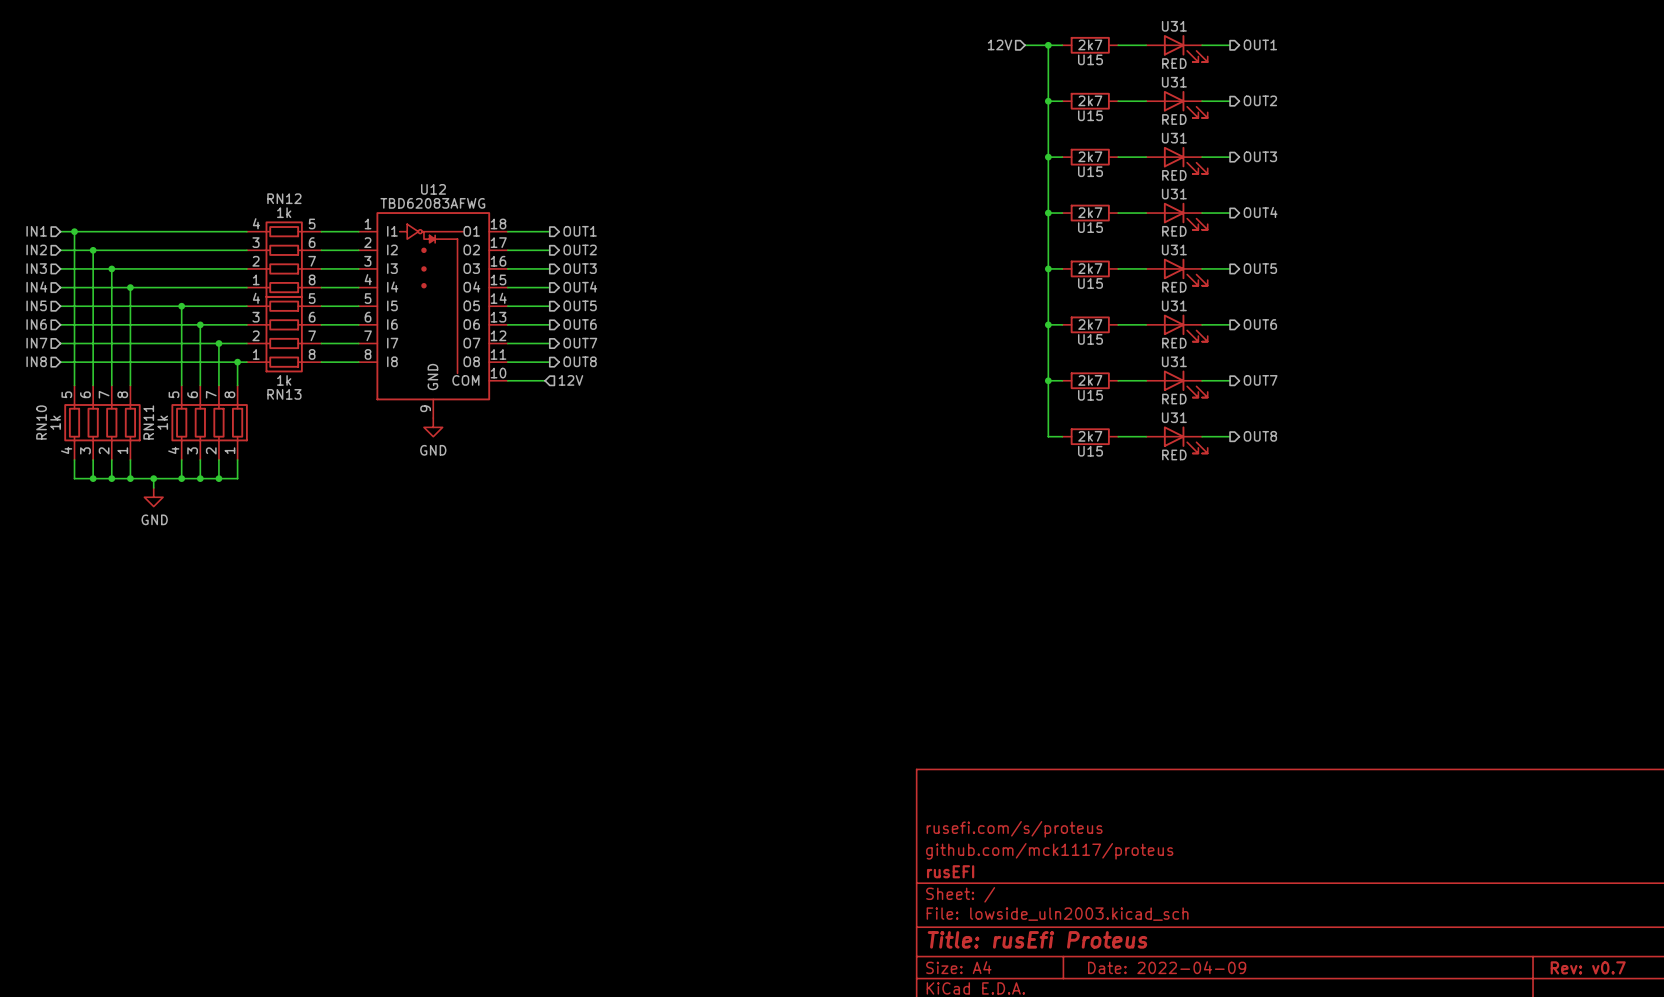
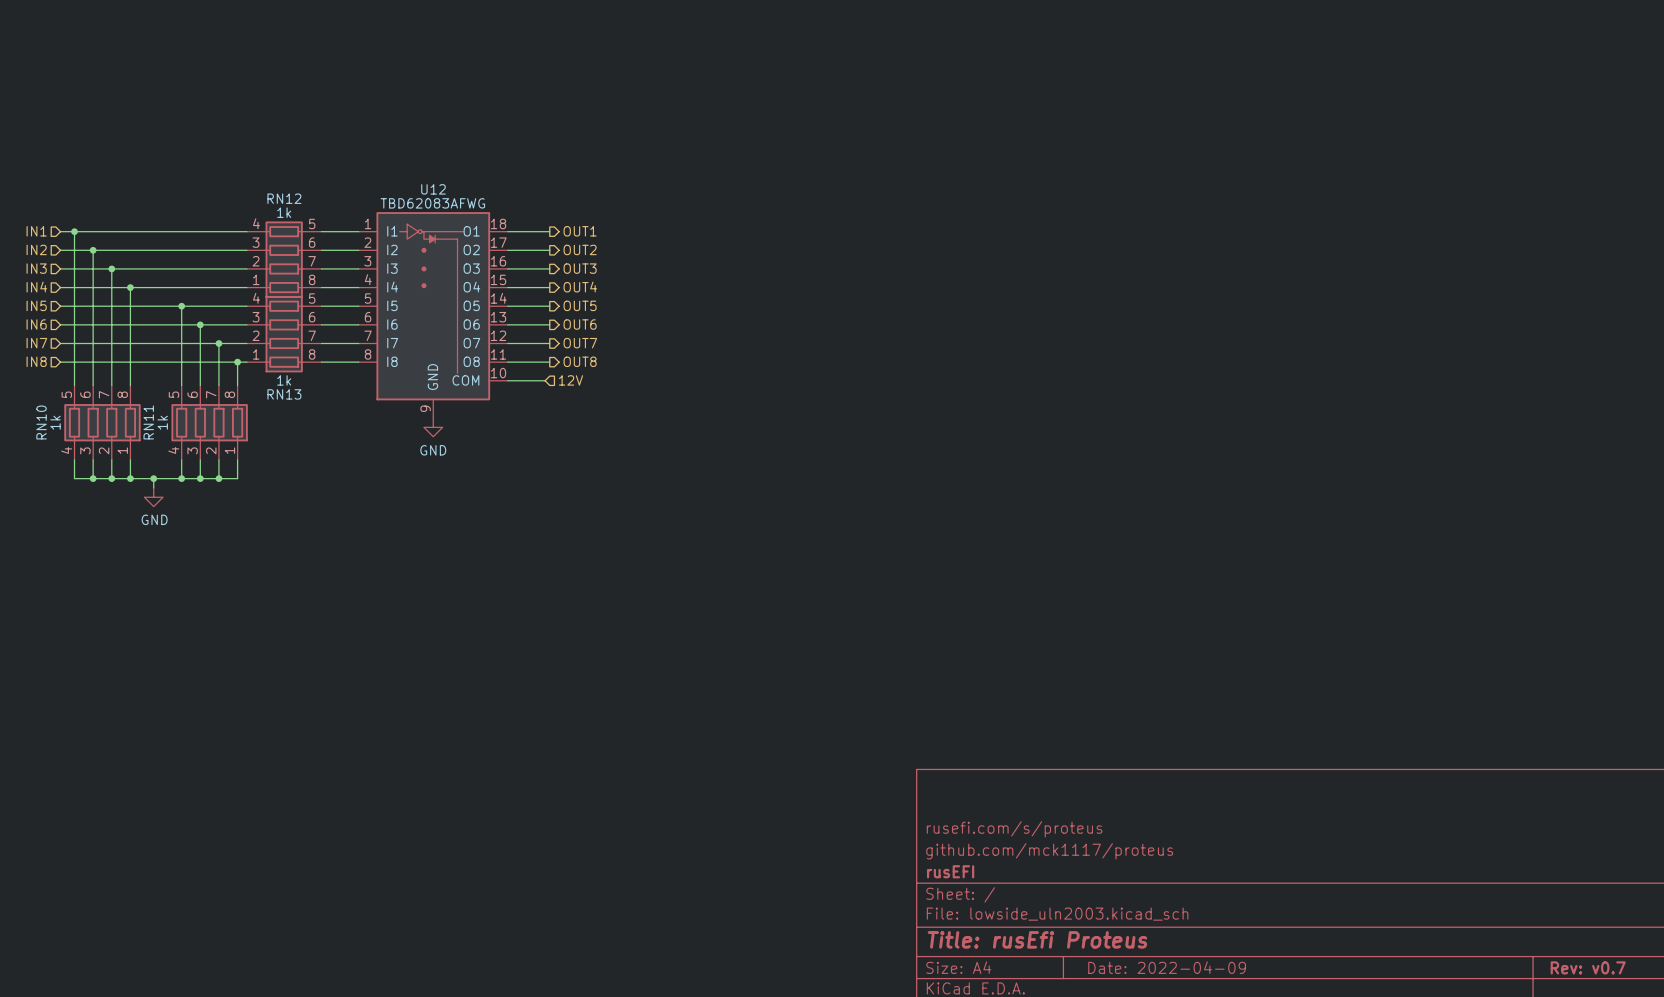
hierarchical label: 12V (1000, 44) -> none
hierarchical label: OUT1 (1260, 44) -> none
wire: (1025, 45) (1062, 45) -> none
wire: (1048, 45) (1048, 436) (1062, 436) -> none
junction: (1048, 45) -> none
U15: 2k7 (1090, 45) -> none
wire: (1118, 45) (1146, 45) -> none
wire: (1202, 45) (1230, 45) -> none
U31: RED (1176, 48) -> none
hierarchical label: OUT2 (1260, 100) -> none
wire: (1048, 101) (1062, 101) -> none
junction: (1048, 101) -> none
U15: 2k7 (1090, 101) -> none
wire: (1118, 101) (1146, 101) -> none
wire: (1202, 101) (1230, 101) -> none
U31: RED (1176, 104) -> none
hierarchical label: OUT3 (1260, 156) -> none
wire: (1048, 157) (1062, 157) -> none
junction: (1048, 157) -> none
U15: 2k7 (1090, 157) -> none
wire: (1118, 157) (1146, 157) -> none
wire: (1202, 157) (1230, 157) -> none
U31: RED (1176, 160) -> none
hierarchical label: OUT4 (1260, 212) -> none
wire: (1048, 213) (1062, 213) -> none
junction: (1048, 213) -> none
U15: 2k7 (1090, 213) -> none
wire: (1118, 213) (1146, 213) -> none
wire: (1202, 213) (1230, 213) -> none
U31: RED (1176, 216) -> none
wire: (1048, 268) (1062, 268) -> none
junction: (1048, 268) -> none
U15: 2k7 (1090, 268) -> none
wire: (1118, 268) (1146, 268) -> none
wire: (1202, 268) (1230, 268) -> none
hierarchical label: OUT5 (1260, 268) -> none
U31: RED (1176, 272) -> none
wire: (1048, 324) (1062, 324) -> none
junction: (1048, 324) -> none
U15: 2k7 (1090, 324) -> none
wire: (1118, 324) (1146, 324) -> none
wire: (1202, 324) (1230, 324) -> none
hierarchical label: OUT6 (1260, 324) -> none
U31: RED (1176, 328) -> none
wire: (1048, 380) (1062, 380) -> none
junction: (1048, 380) -> none
U15: 2k7 (1090, 380) -> none
wire: (1118, 380) (1146, 380) -> none
wire: (1202, 380) (1230, 380) -> none
hierarchical label: OUT7 (1260, 380) -> none
U31: RED (1176, 384) -> none
U15: 2k7 (1090, 436) -> none
wire: (1118, 436) (1146, 436) -> none
wire: (1202, 436) (1230, 436) -> none
hierarchical label: OUT8 (1260, 436) -> none
U31: RED (1176, 439) -> none

